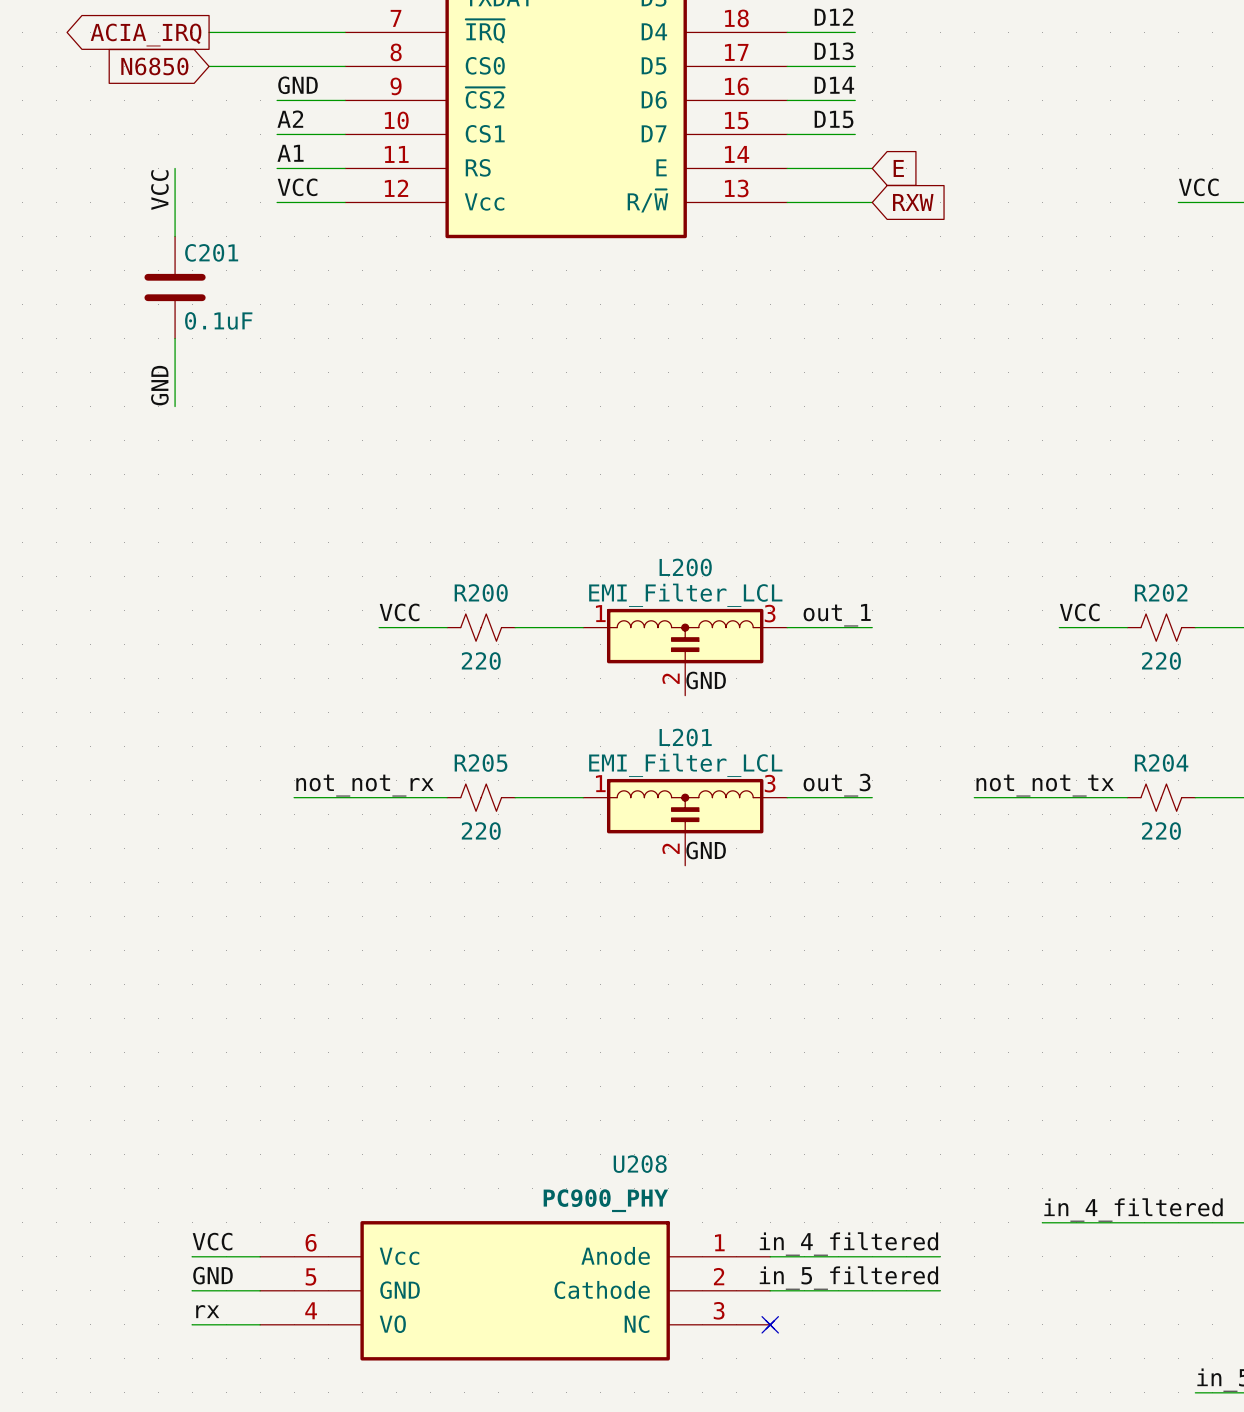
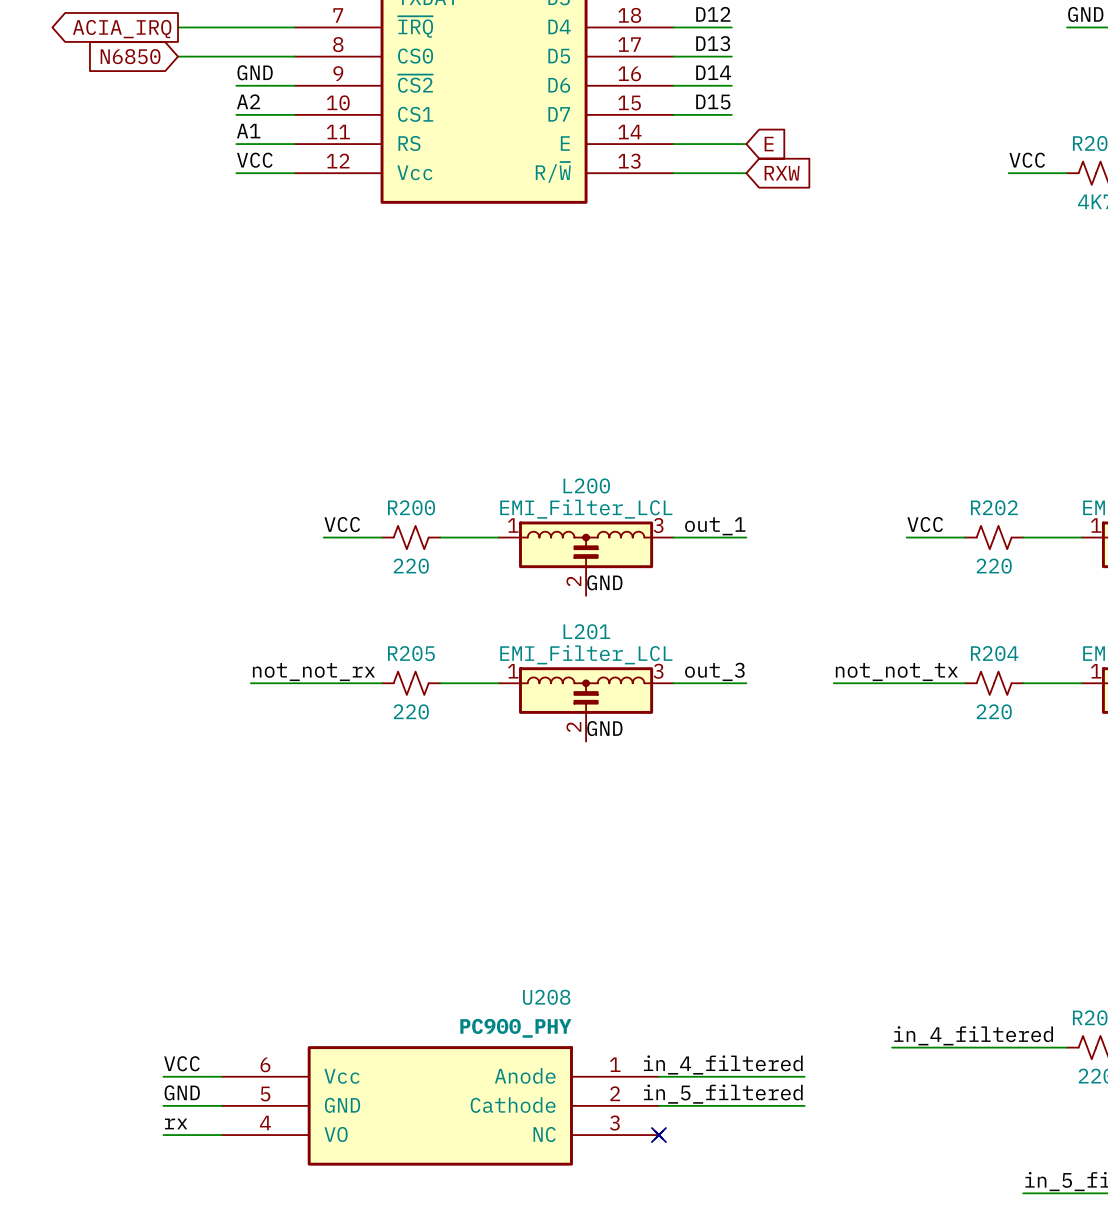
wire: (175, 168) (175, 236) -> none
label: VCC (159, 190) -> none
C201: 0.1uF (175, 287) -> none
wire: (175, 338) (175, 406) -> none
label: GND (159, 385) -> none

